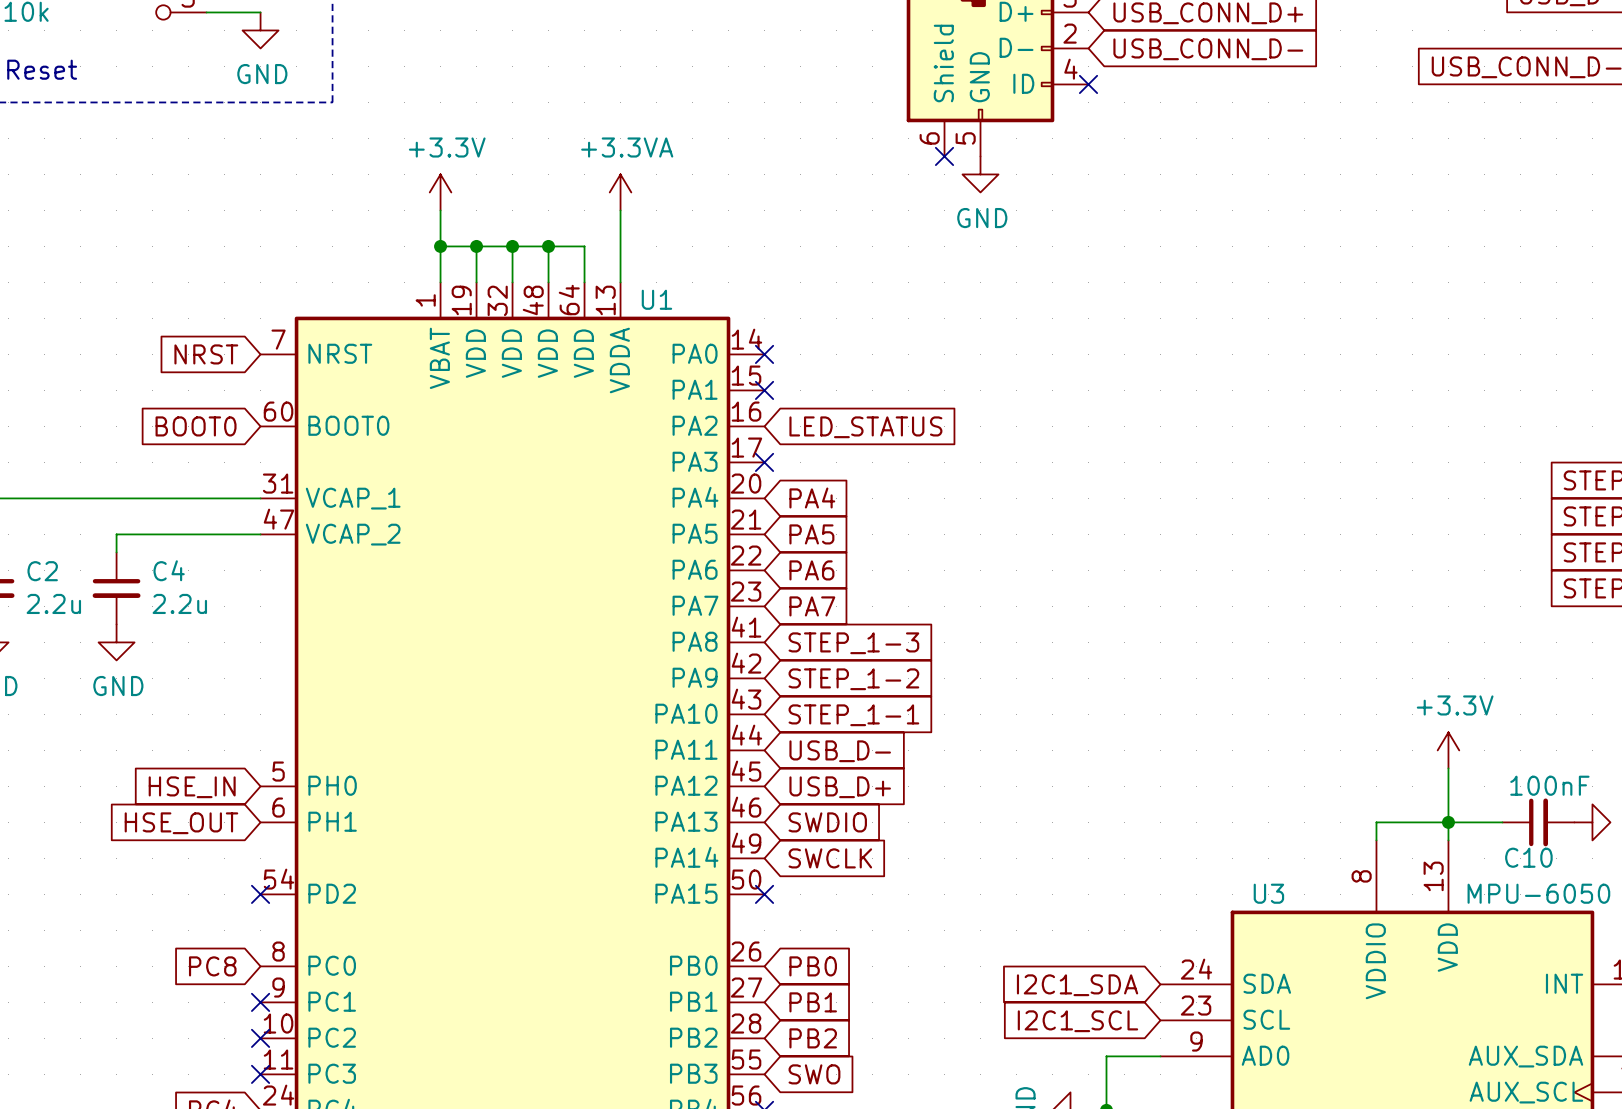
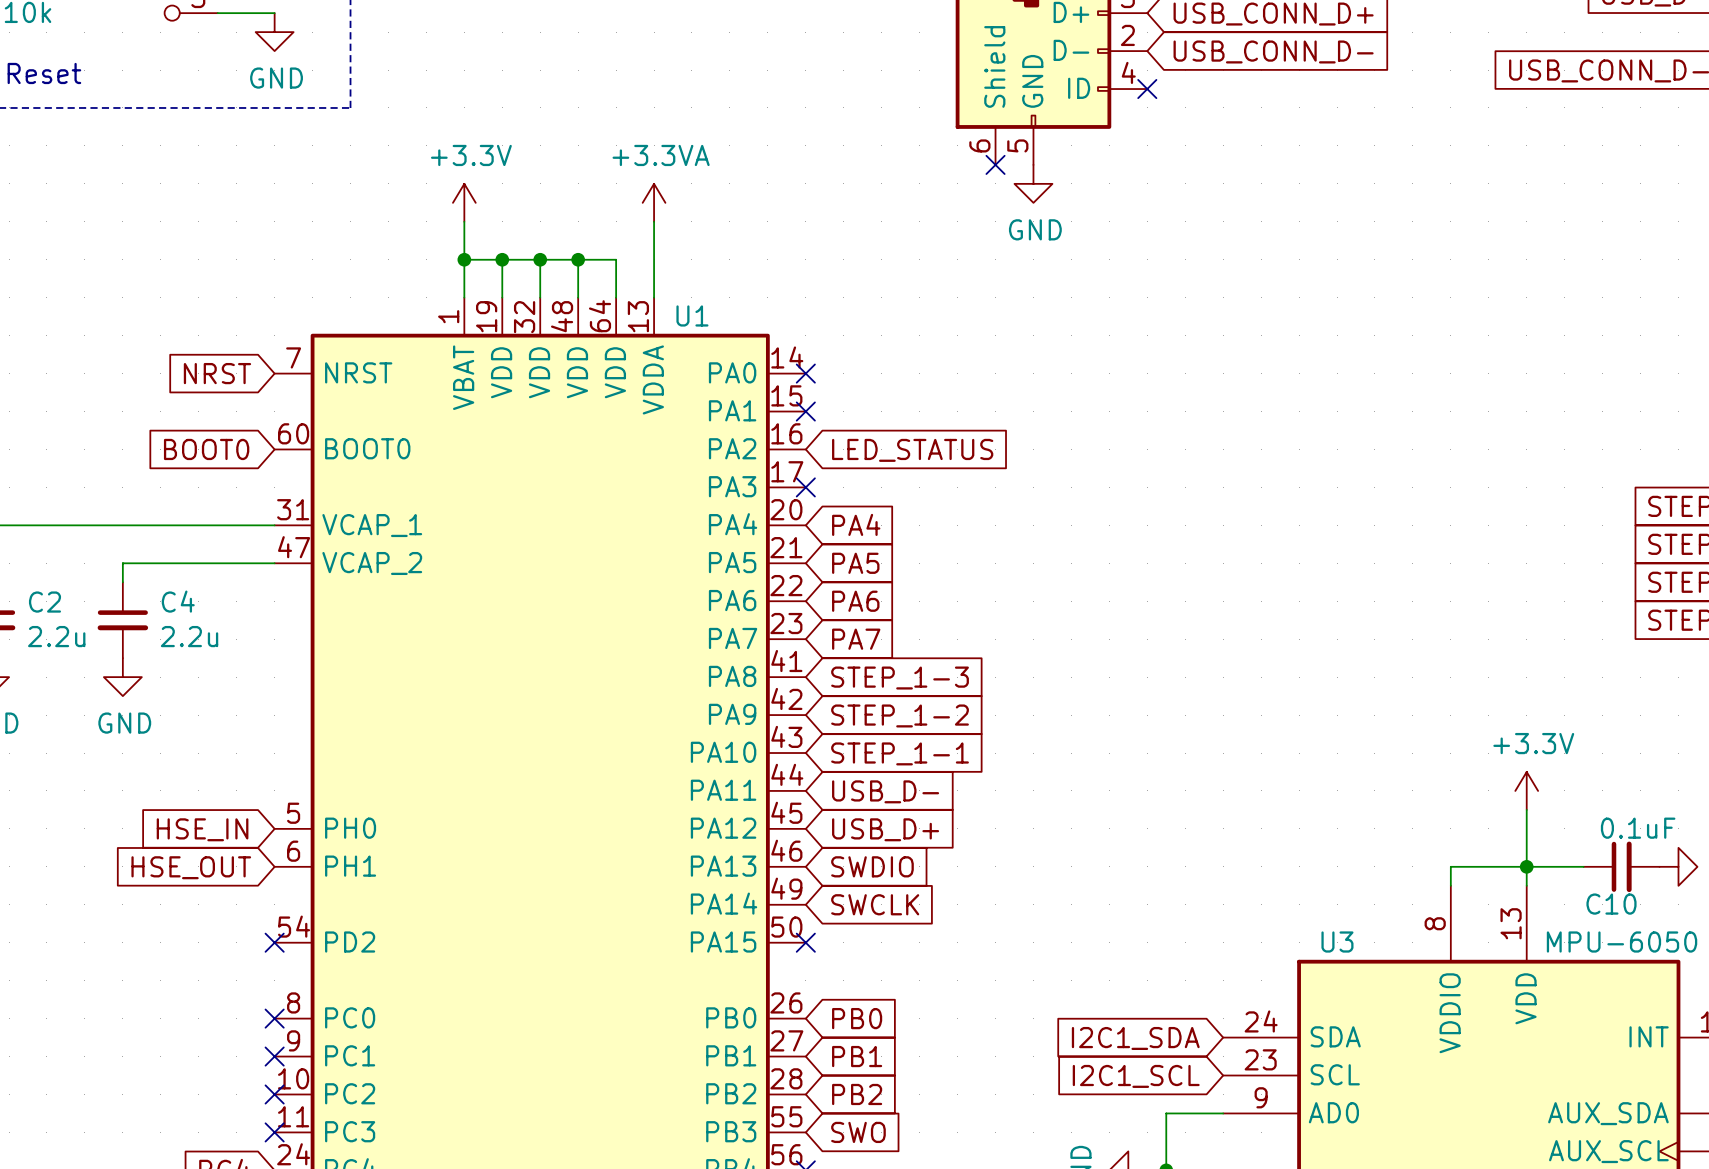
C10 value: 100nF (1549, 785) -> 0.1uF (1638, 828)
global label: PC8 (212, 966) -> none
no-connect mark: none -> (274, 1018)

